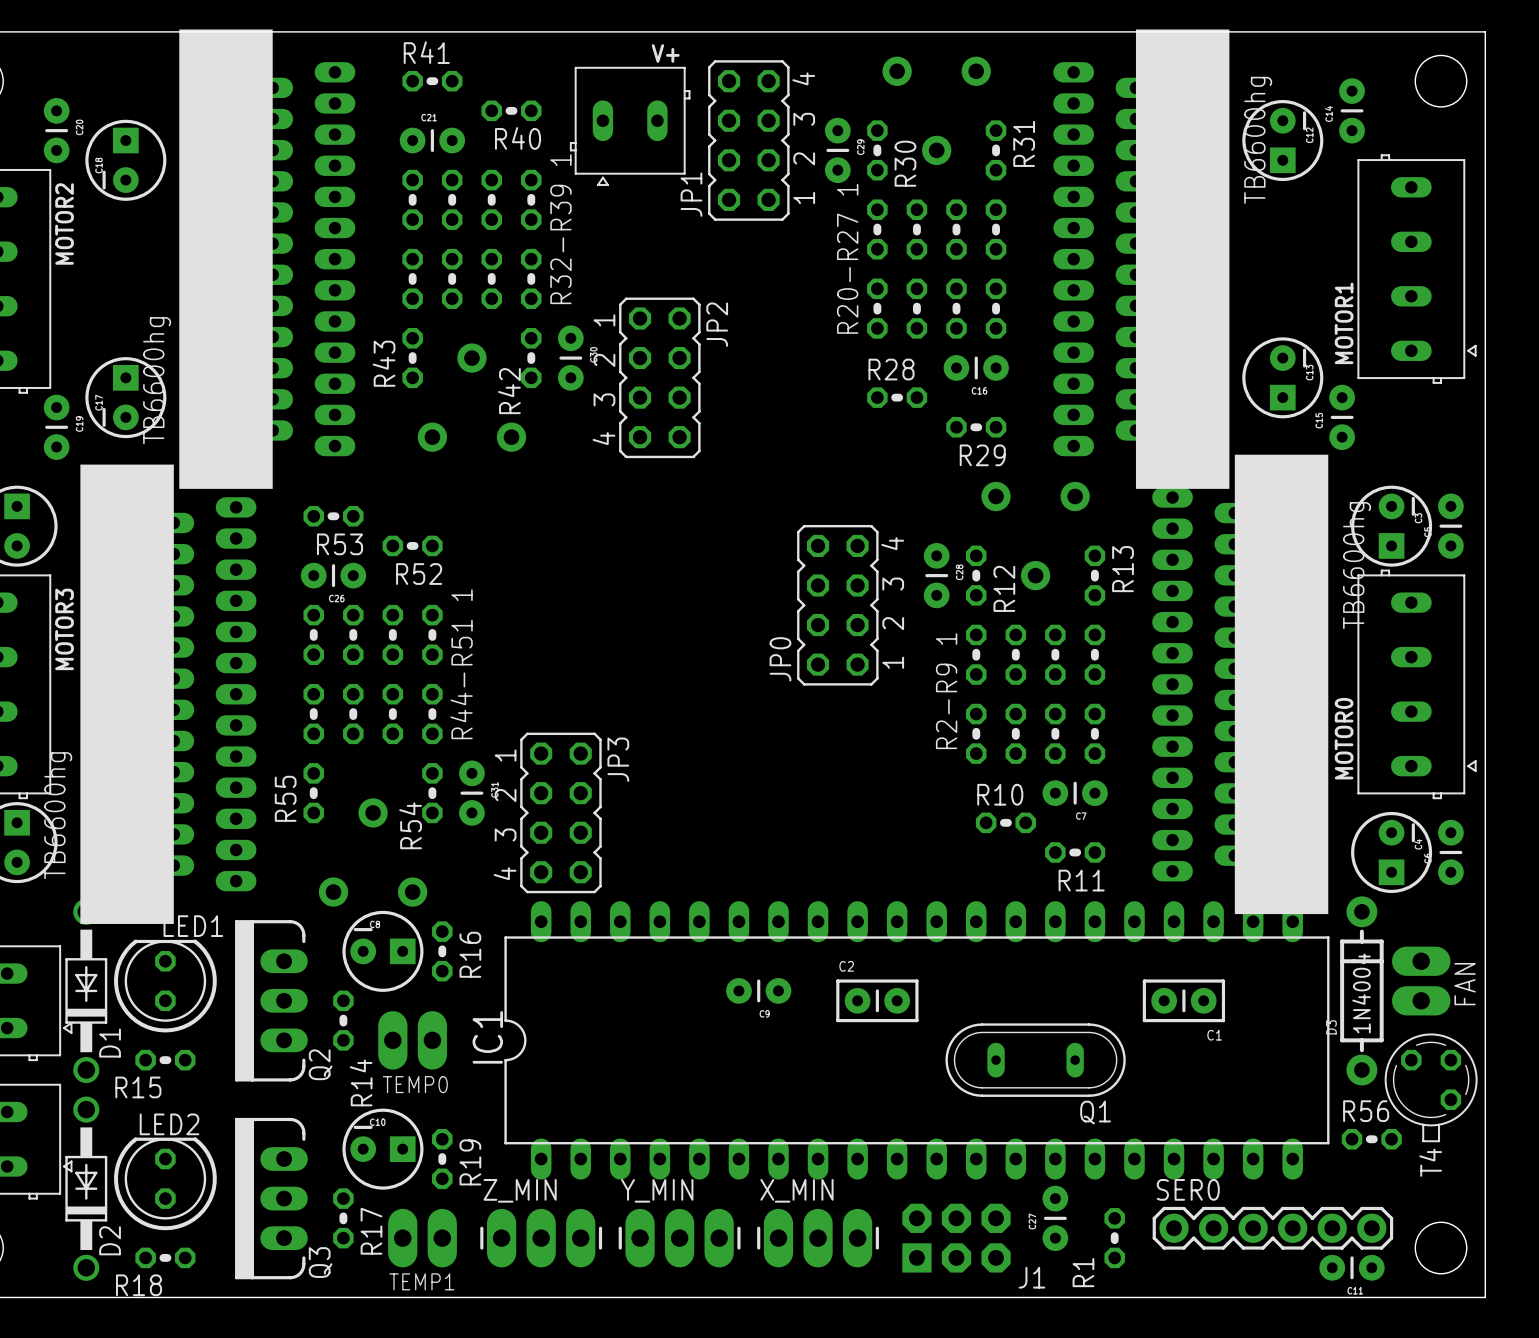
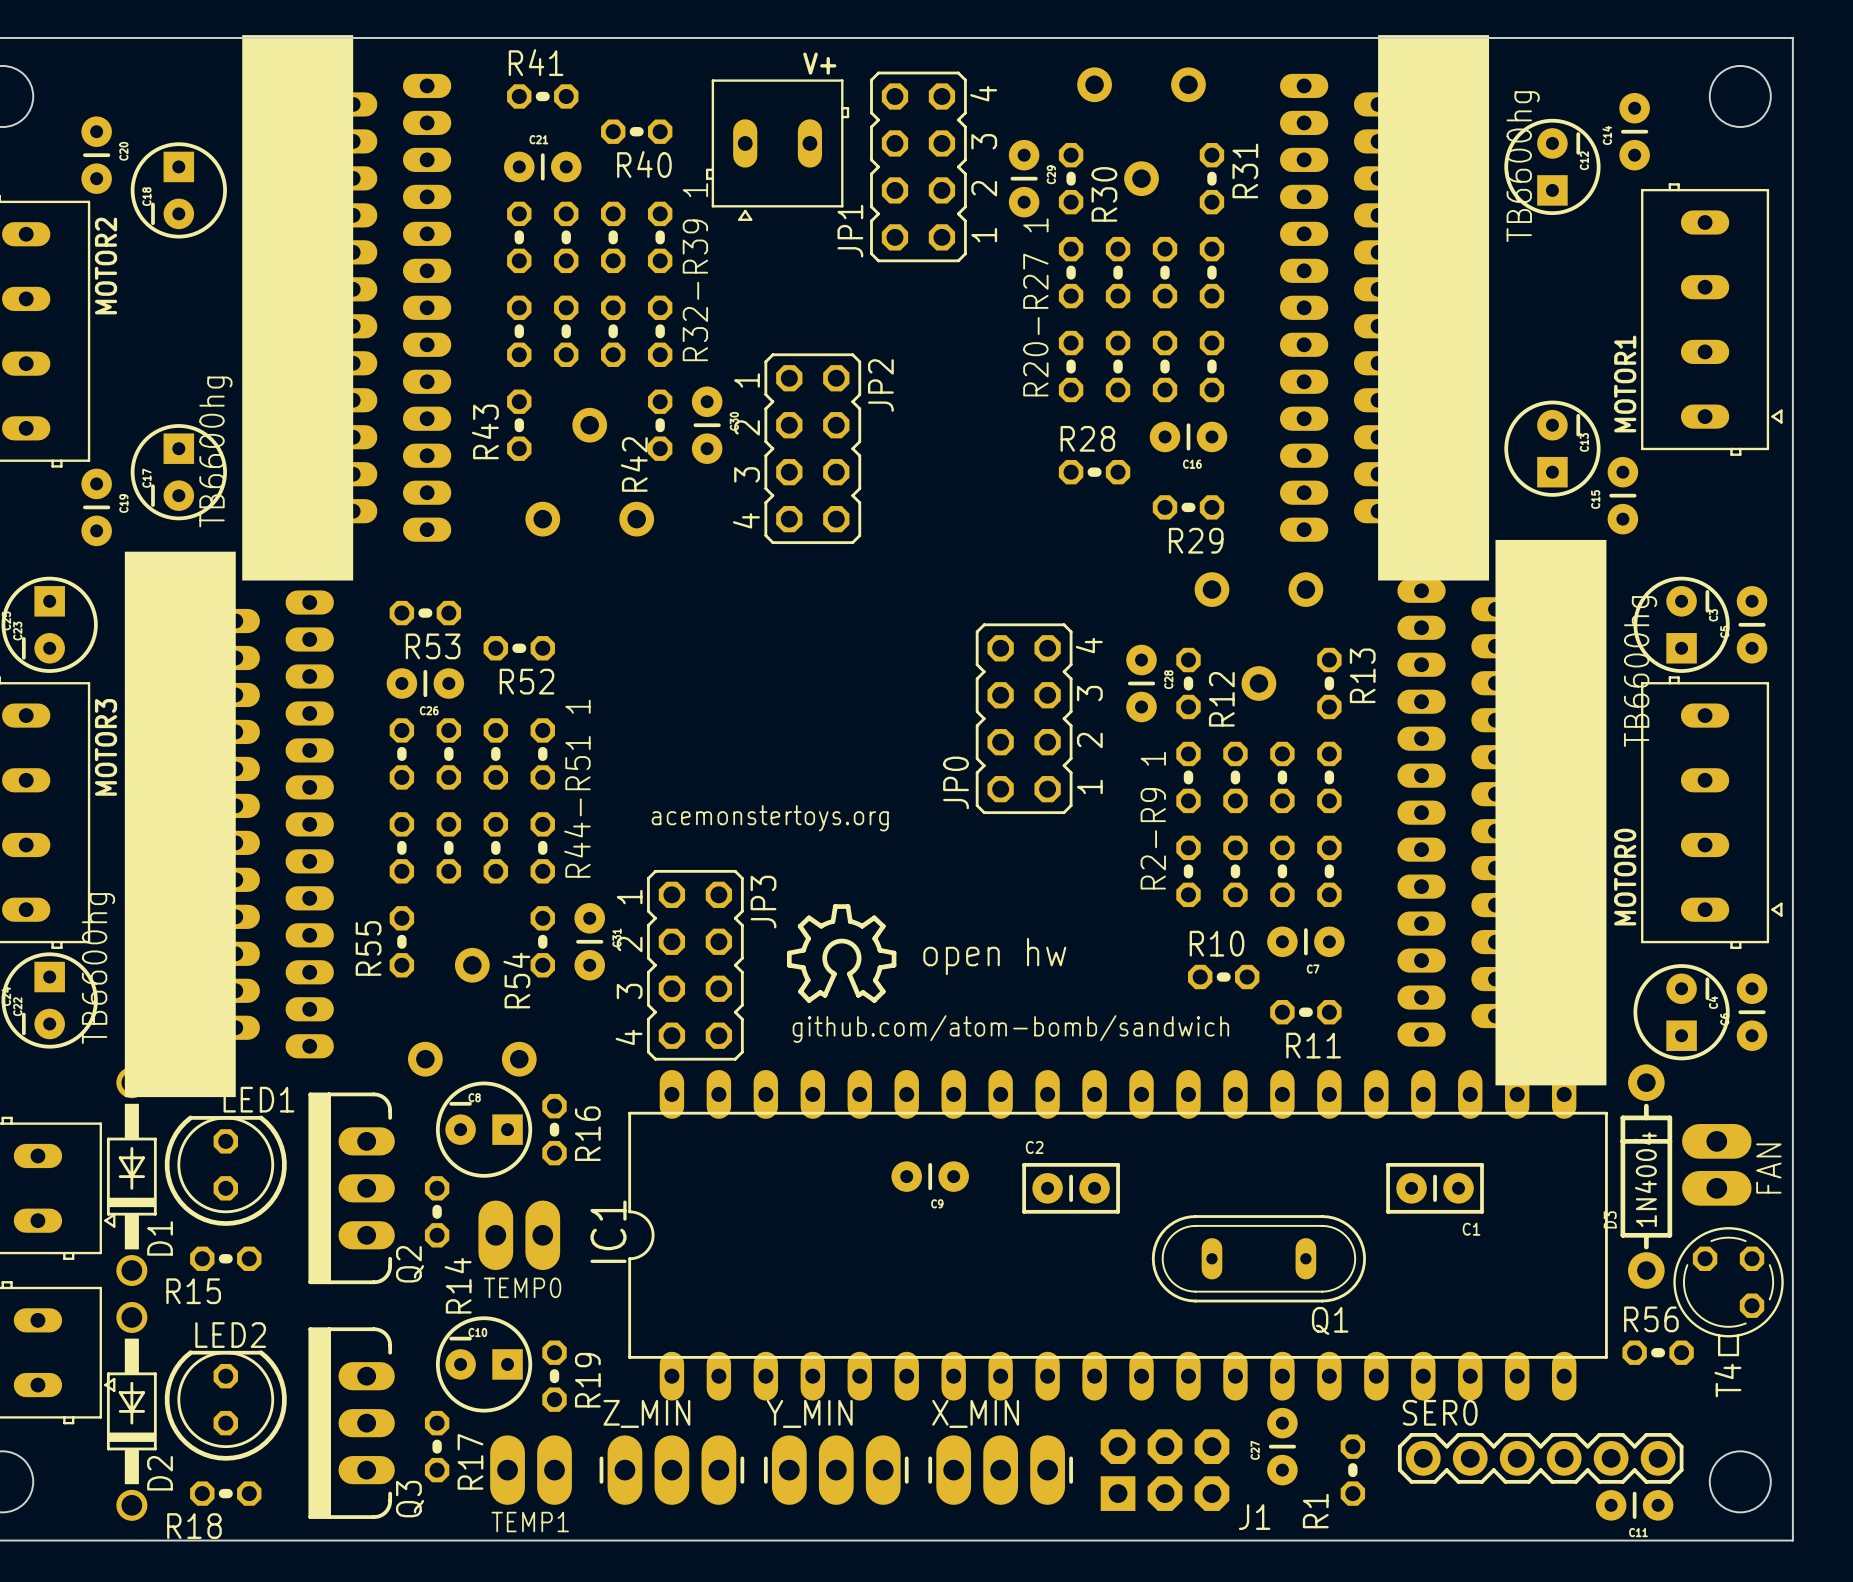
text: none -> acemonstertoys.org (770, 818)
drawing: none -> [786, 904, 897, 1003]
text: none -> open hw (994, 956)
text: none -> github.com/atom-bomb/sandwich (1010, 1029)

